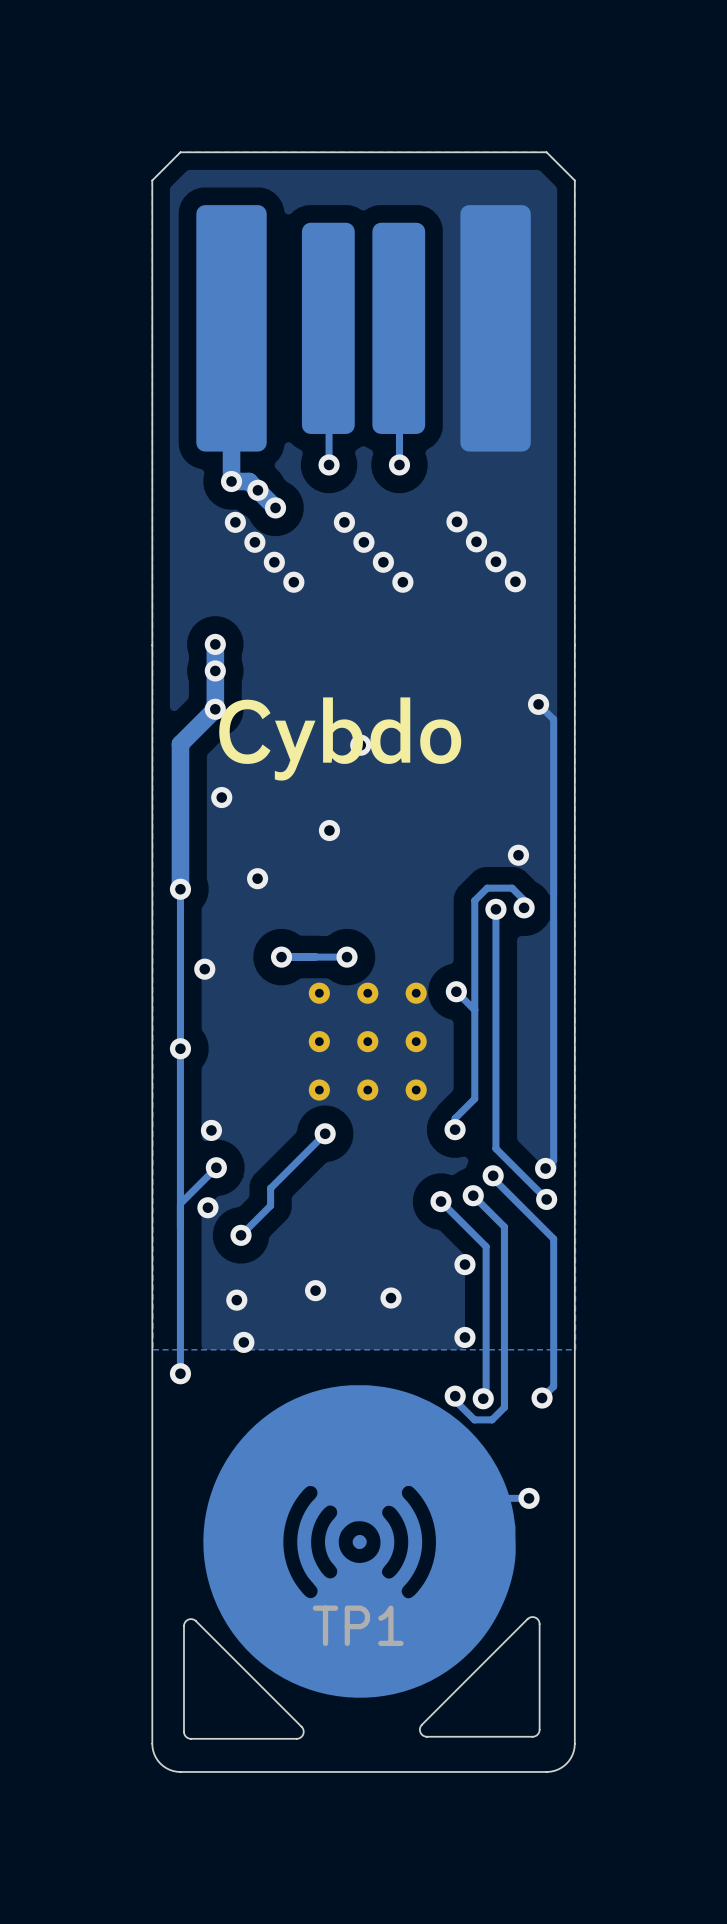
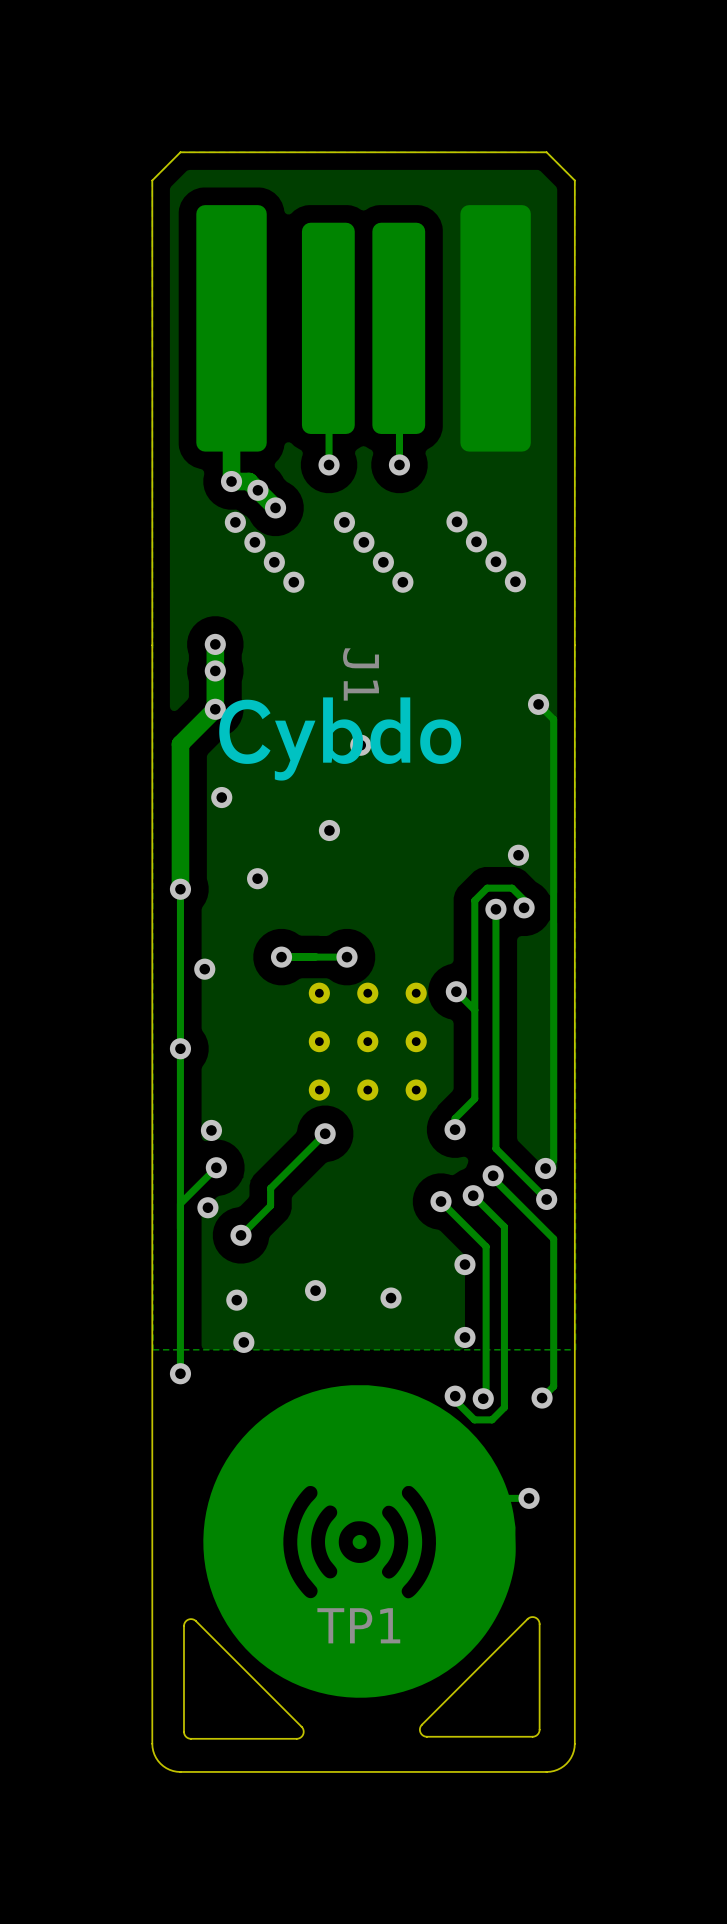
J1 name: none -> J1 (361, 674)

